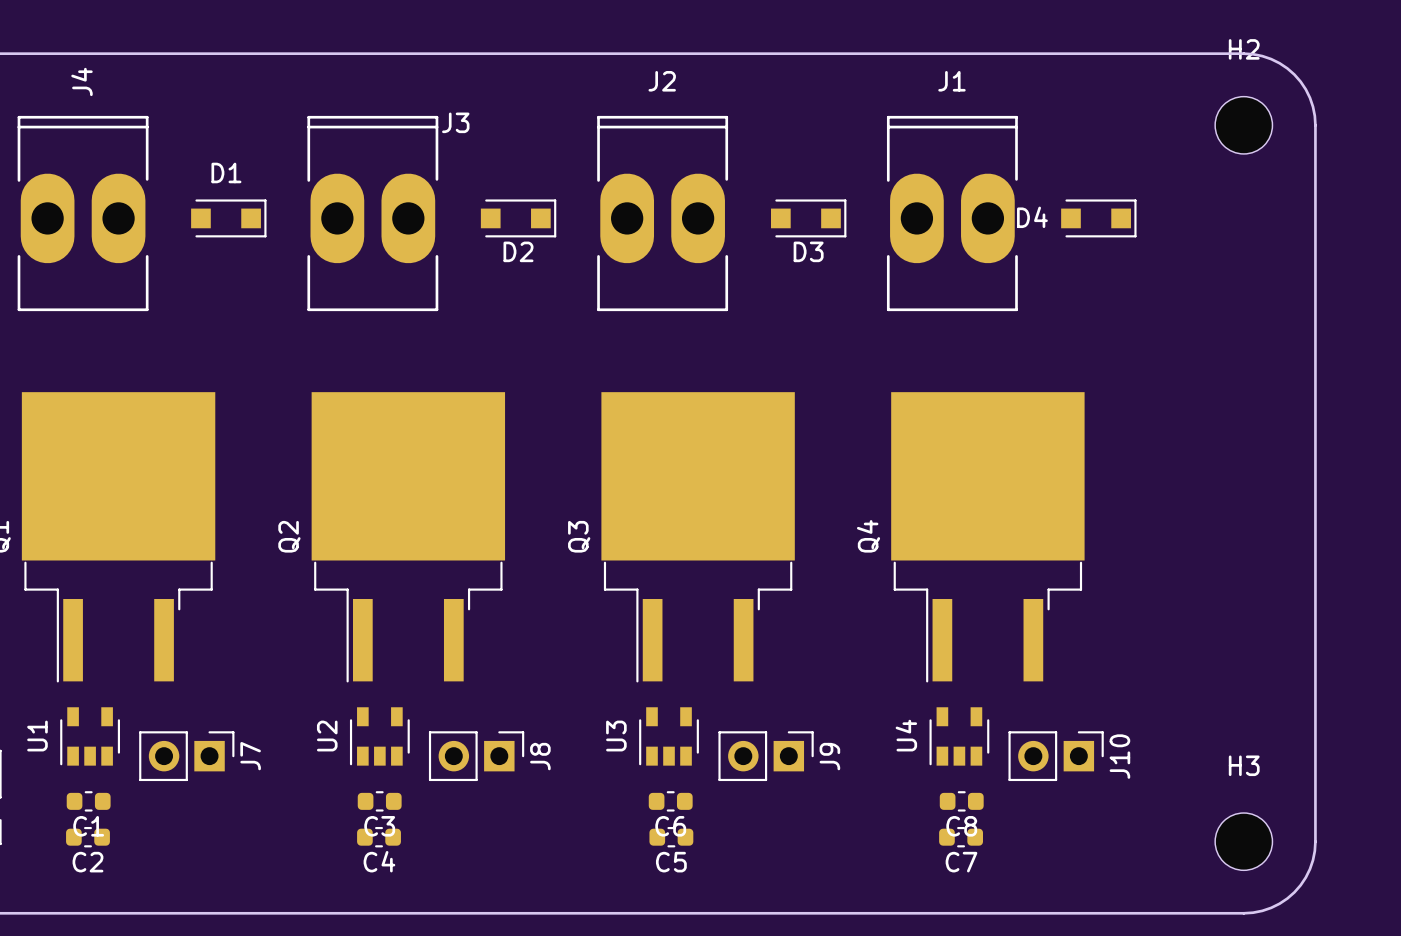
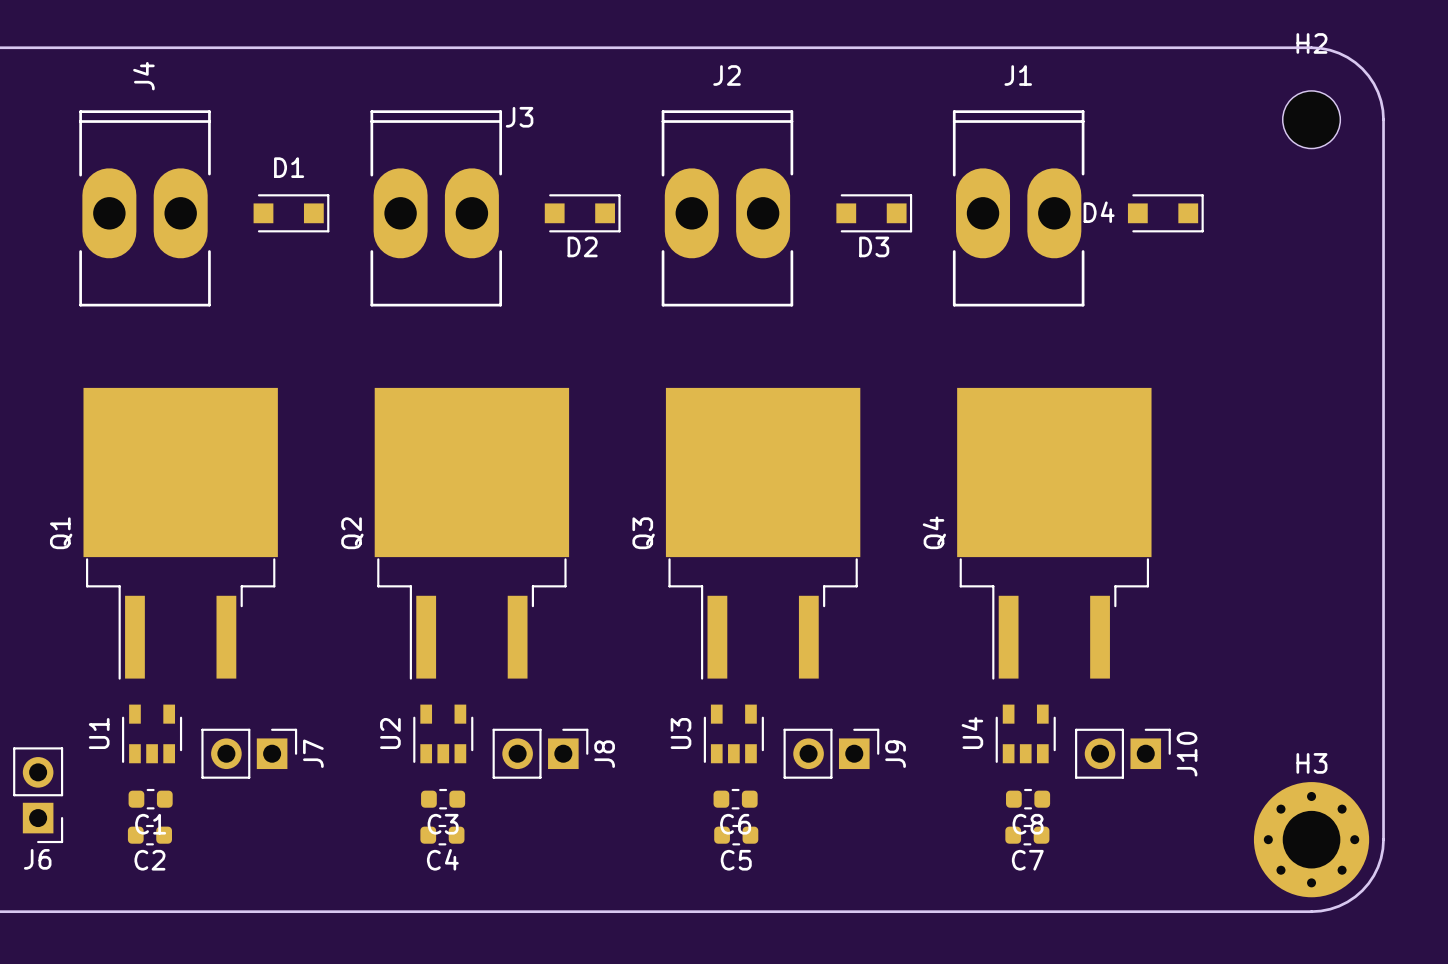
H3 footprint: [1215, 813, 1273, 871] -> [1253, 782, 1370, 898]

